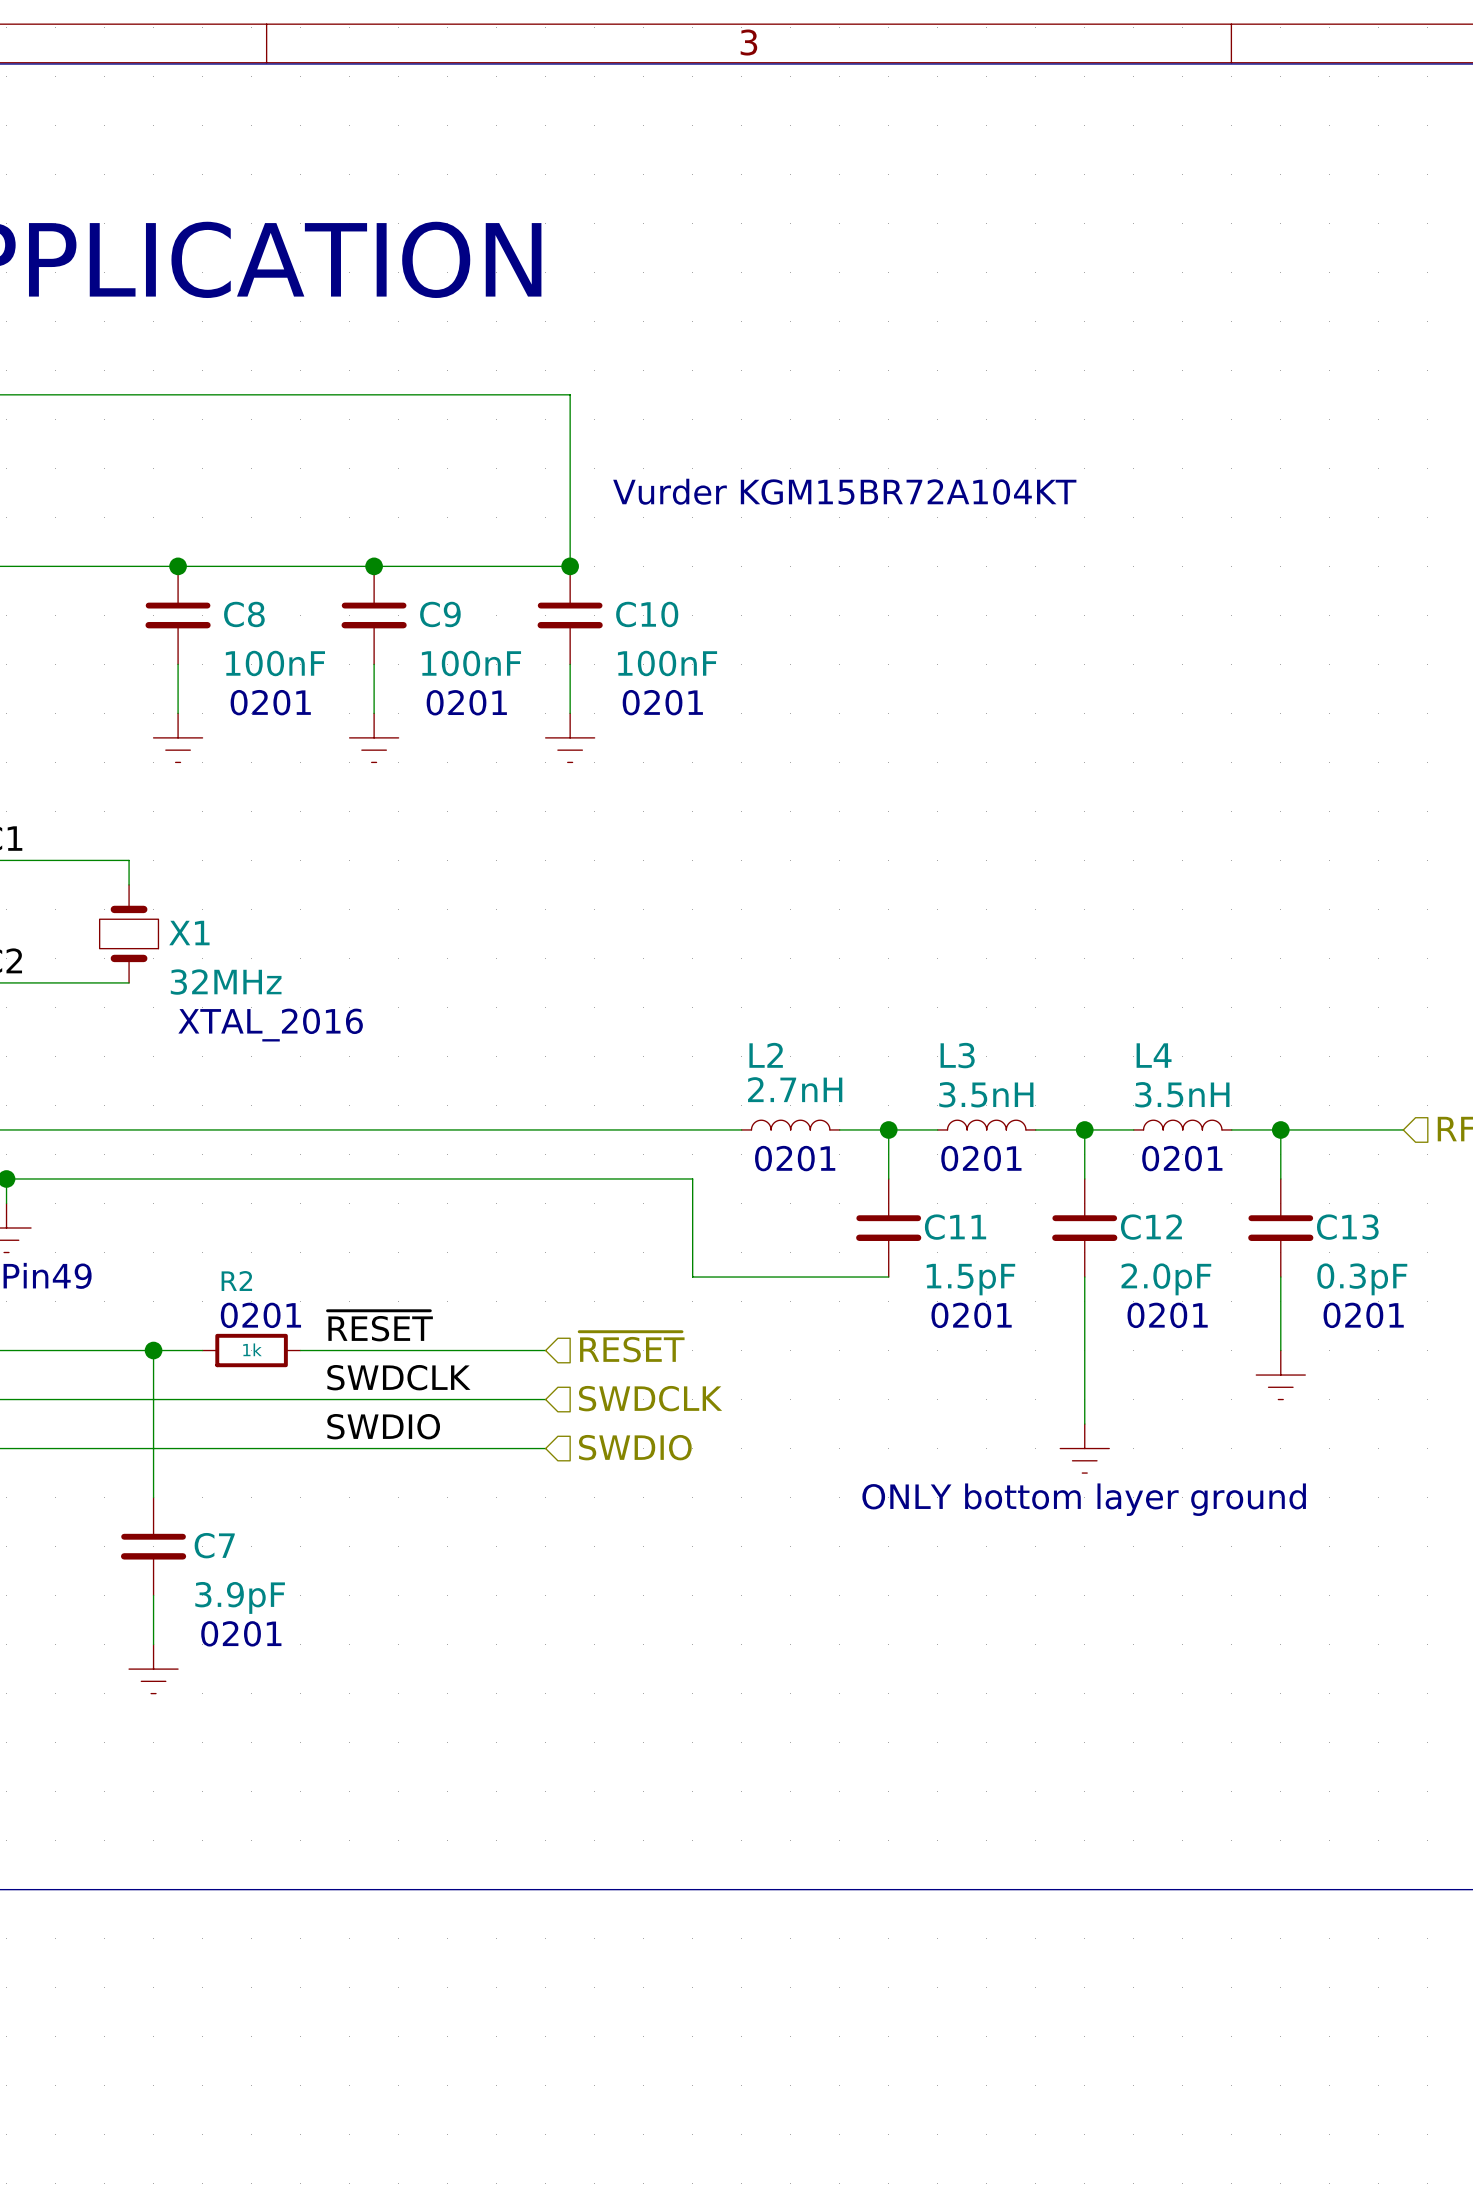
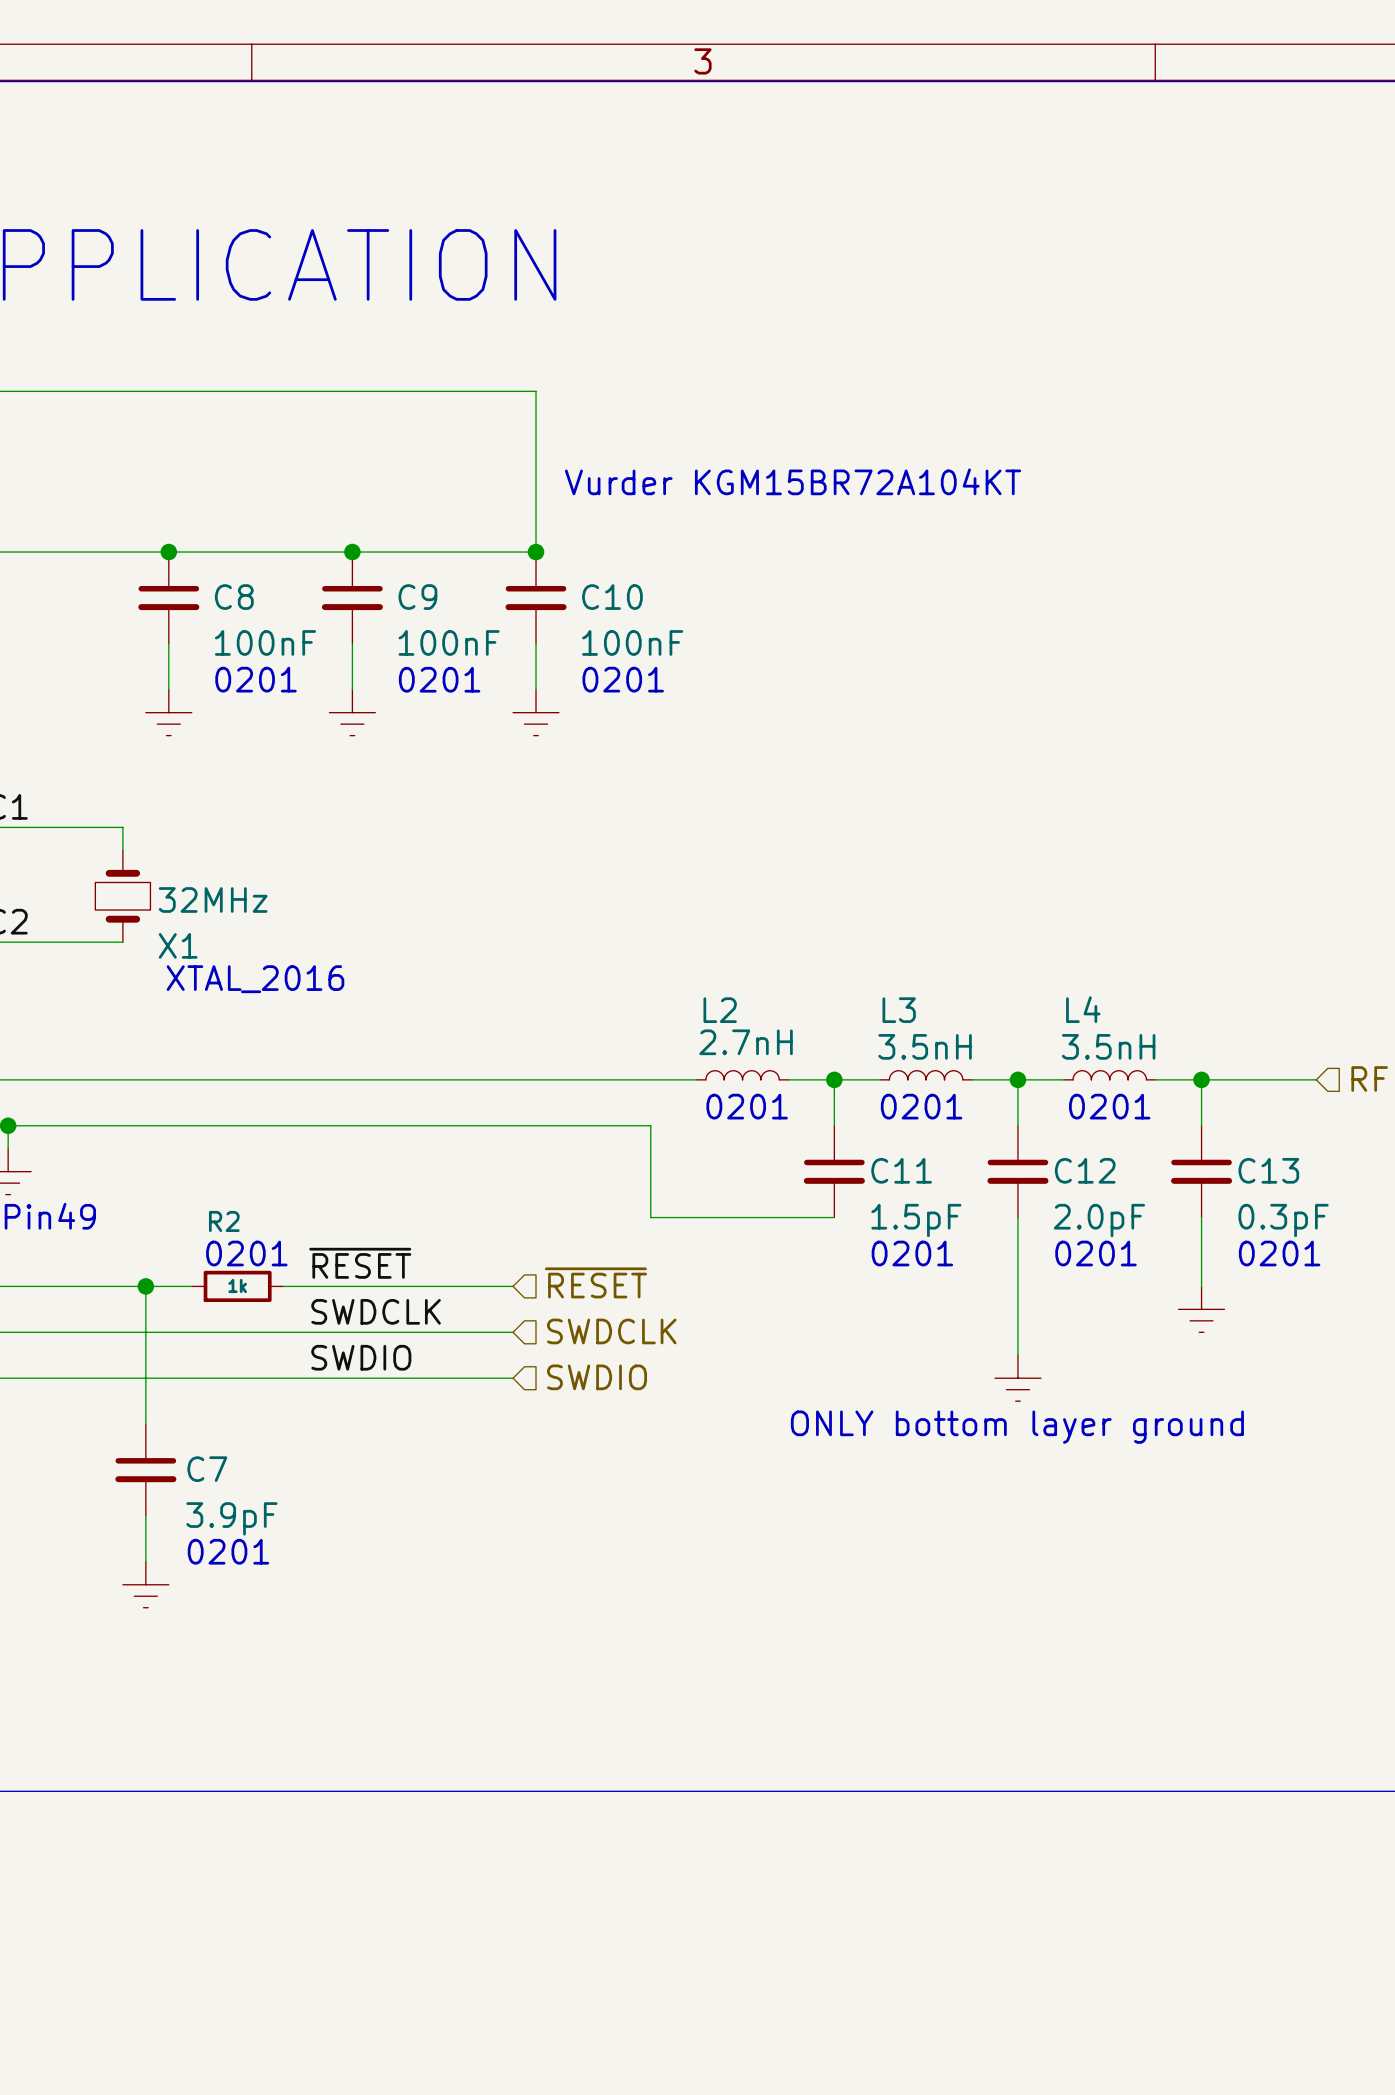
X1 name position: X1 (189, 933) -> X1 (178, 945)
X1 value position: 32MHz (226, 982) -> 32MHz (213, 900)

